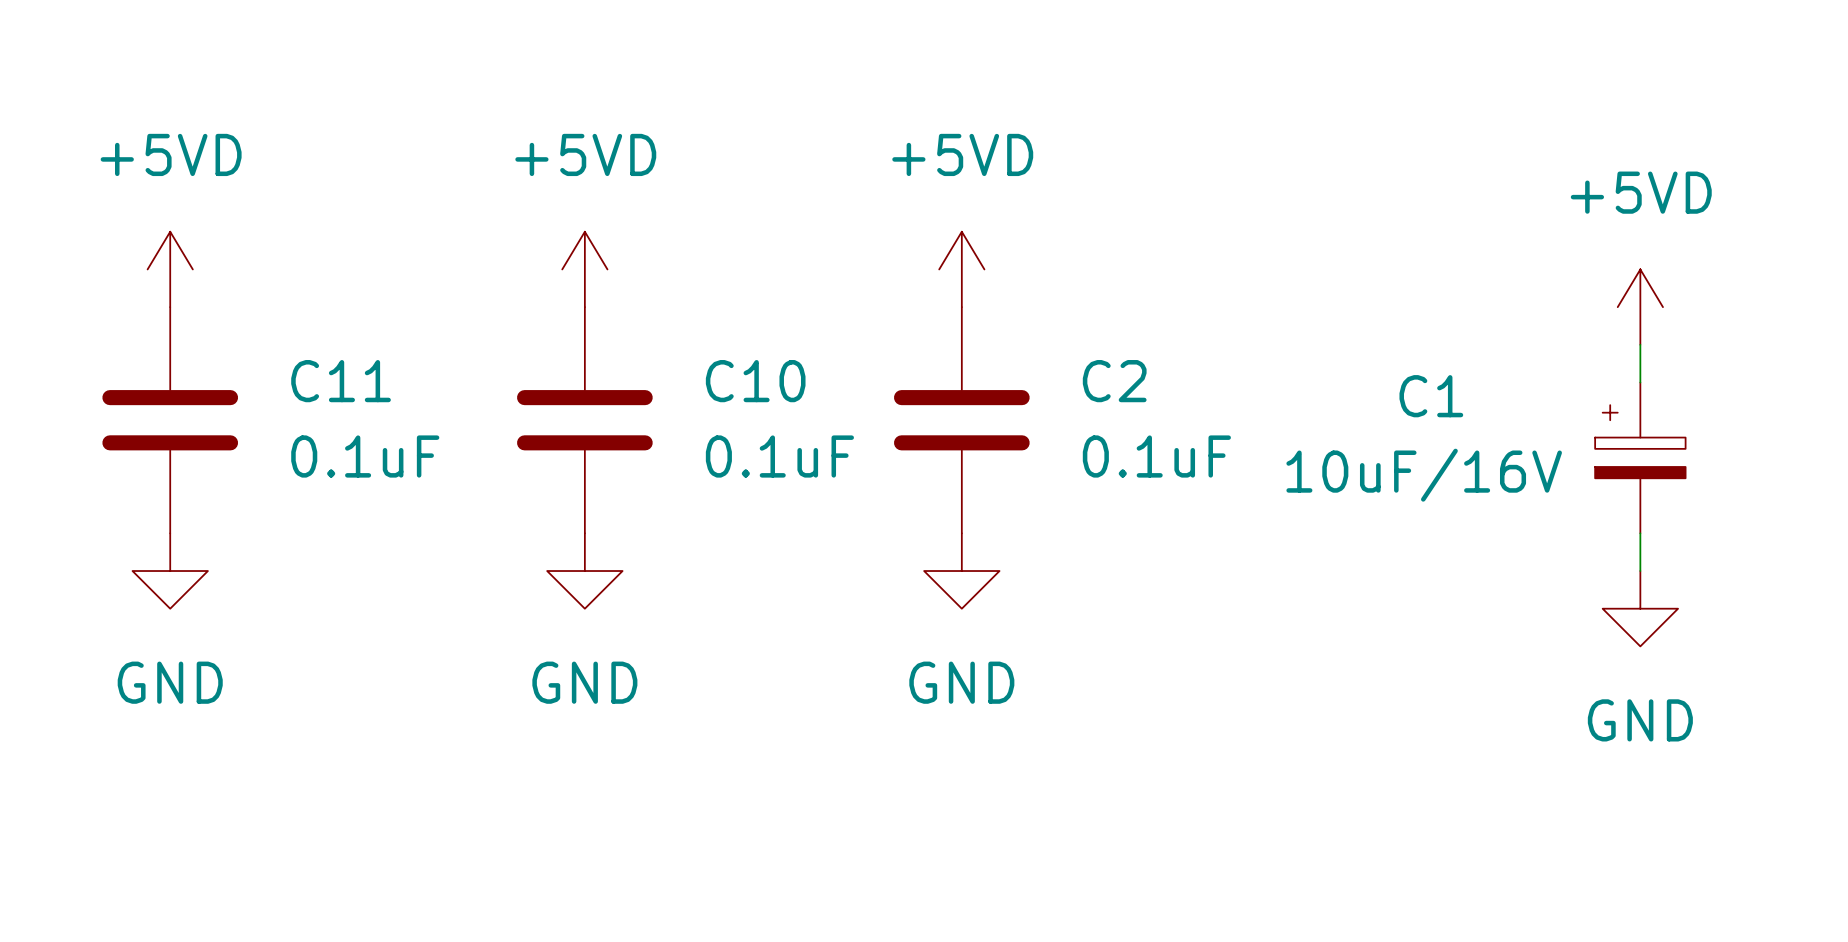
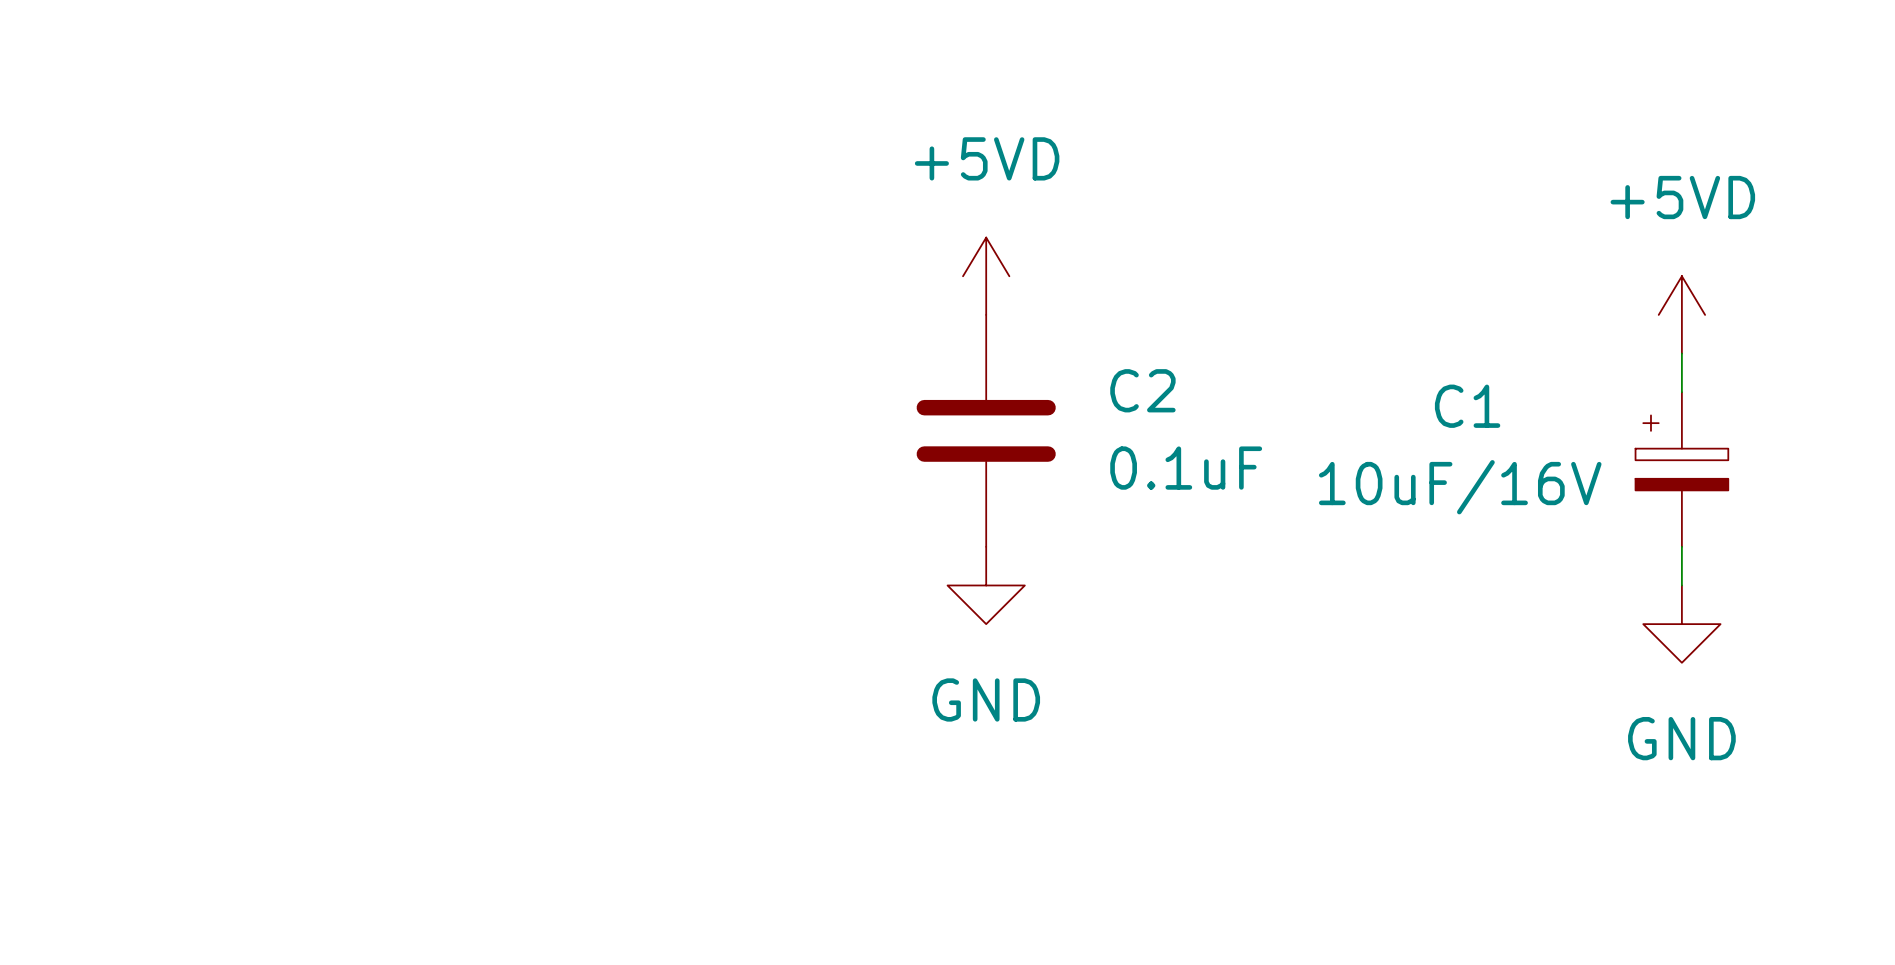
power symbol: +5VD (170, 269) -> none
power symbol: +5VD (584, 269) -> none
C11: 0.1uF (170, 420) -> none
C10: 0.1uF (584, 420) -> none
power symbol: GND (170, 571) -> none
power symbol: GND (584, 571) -> none

